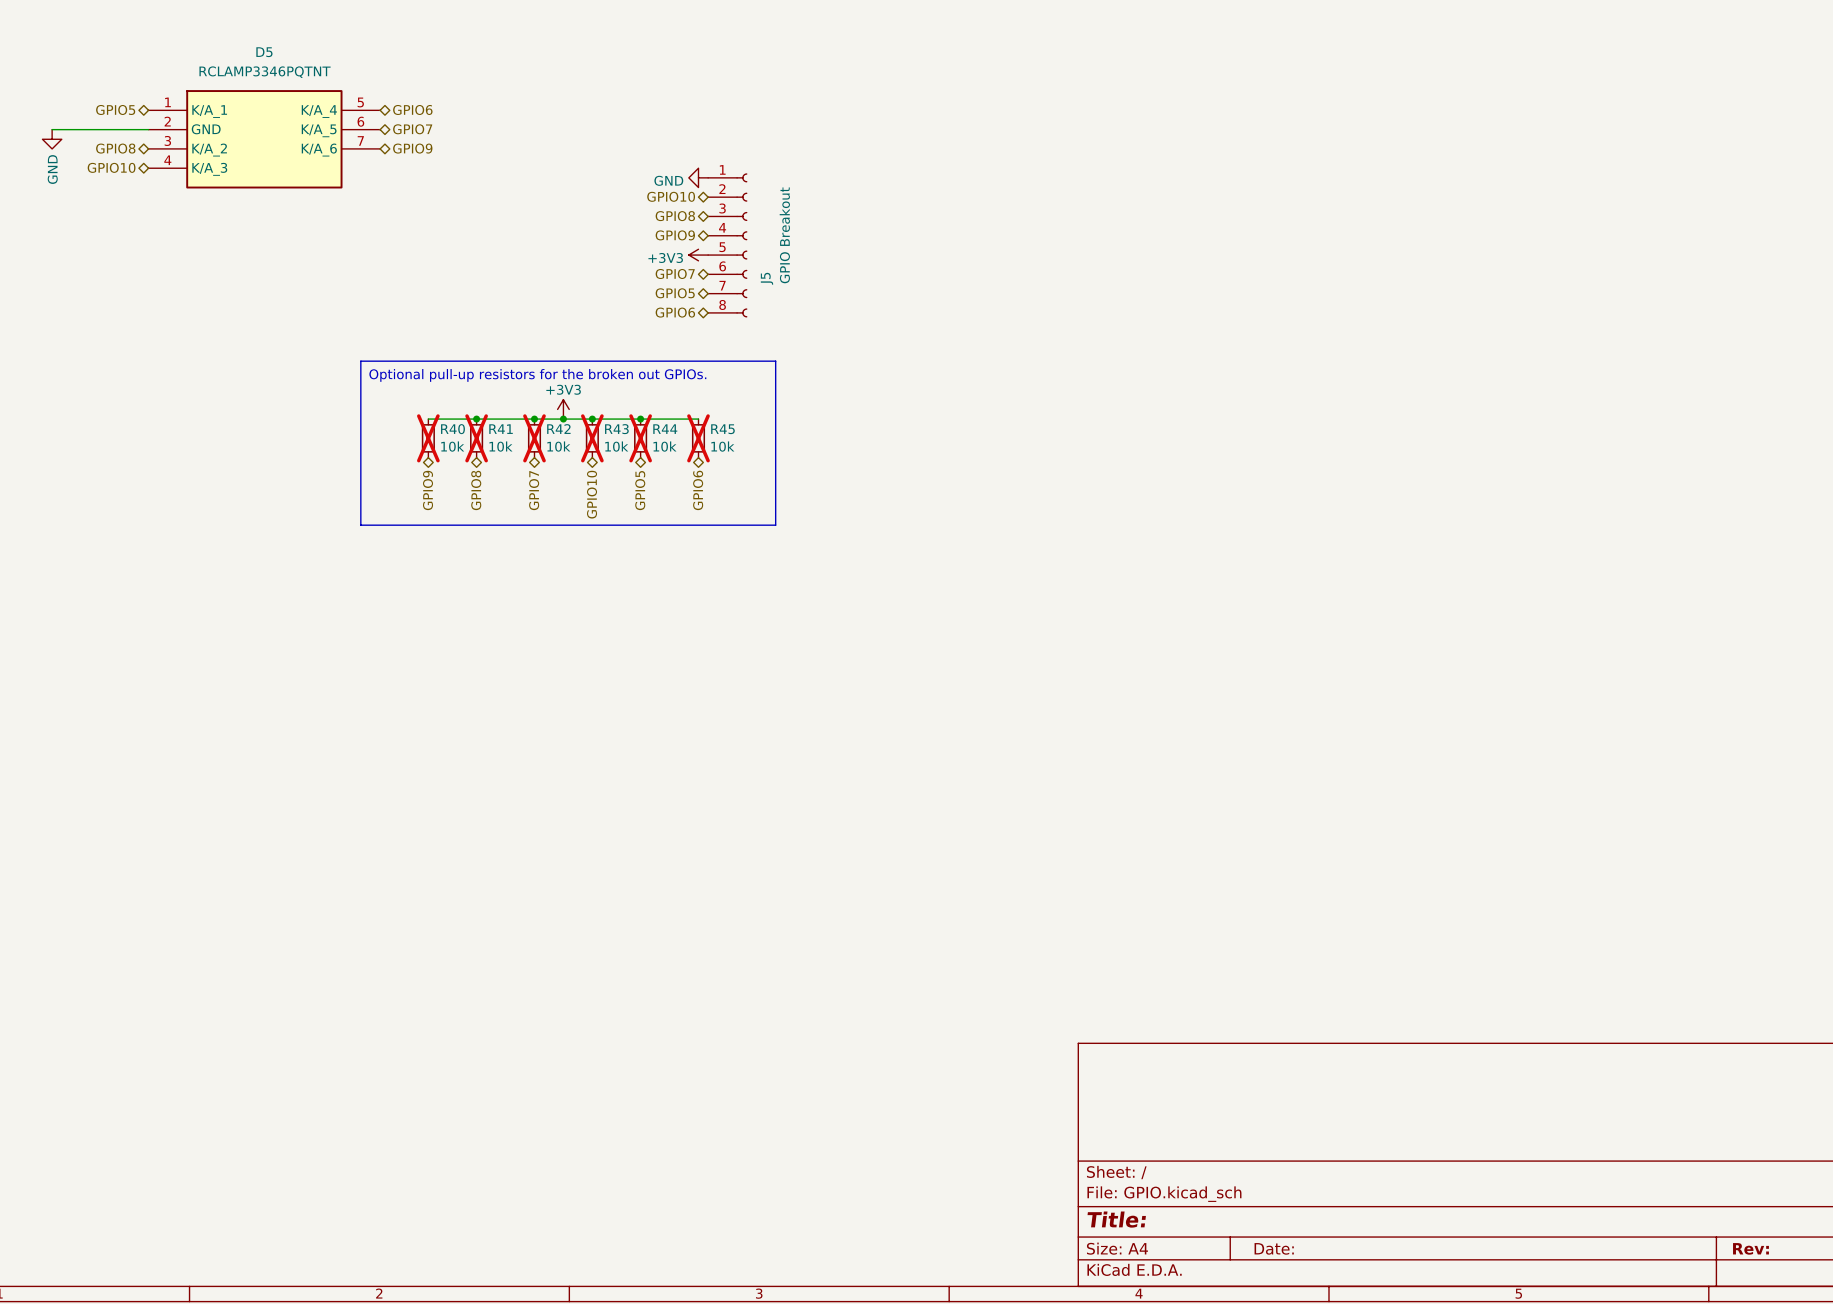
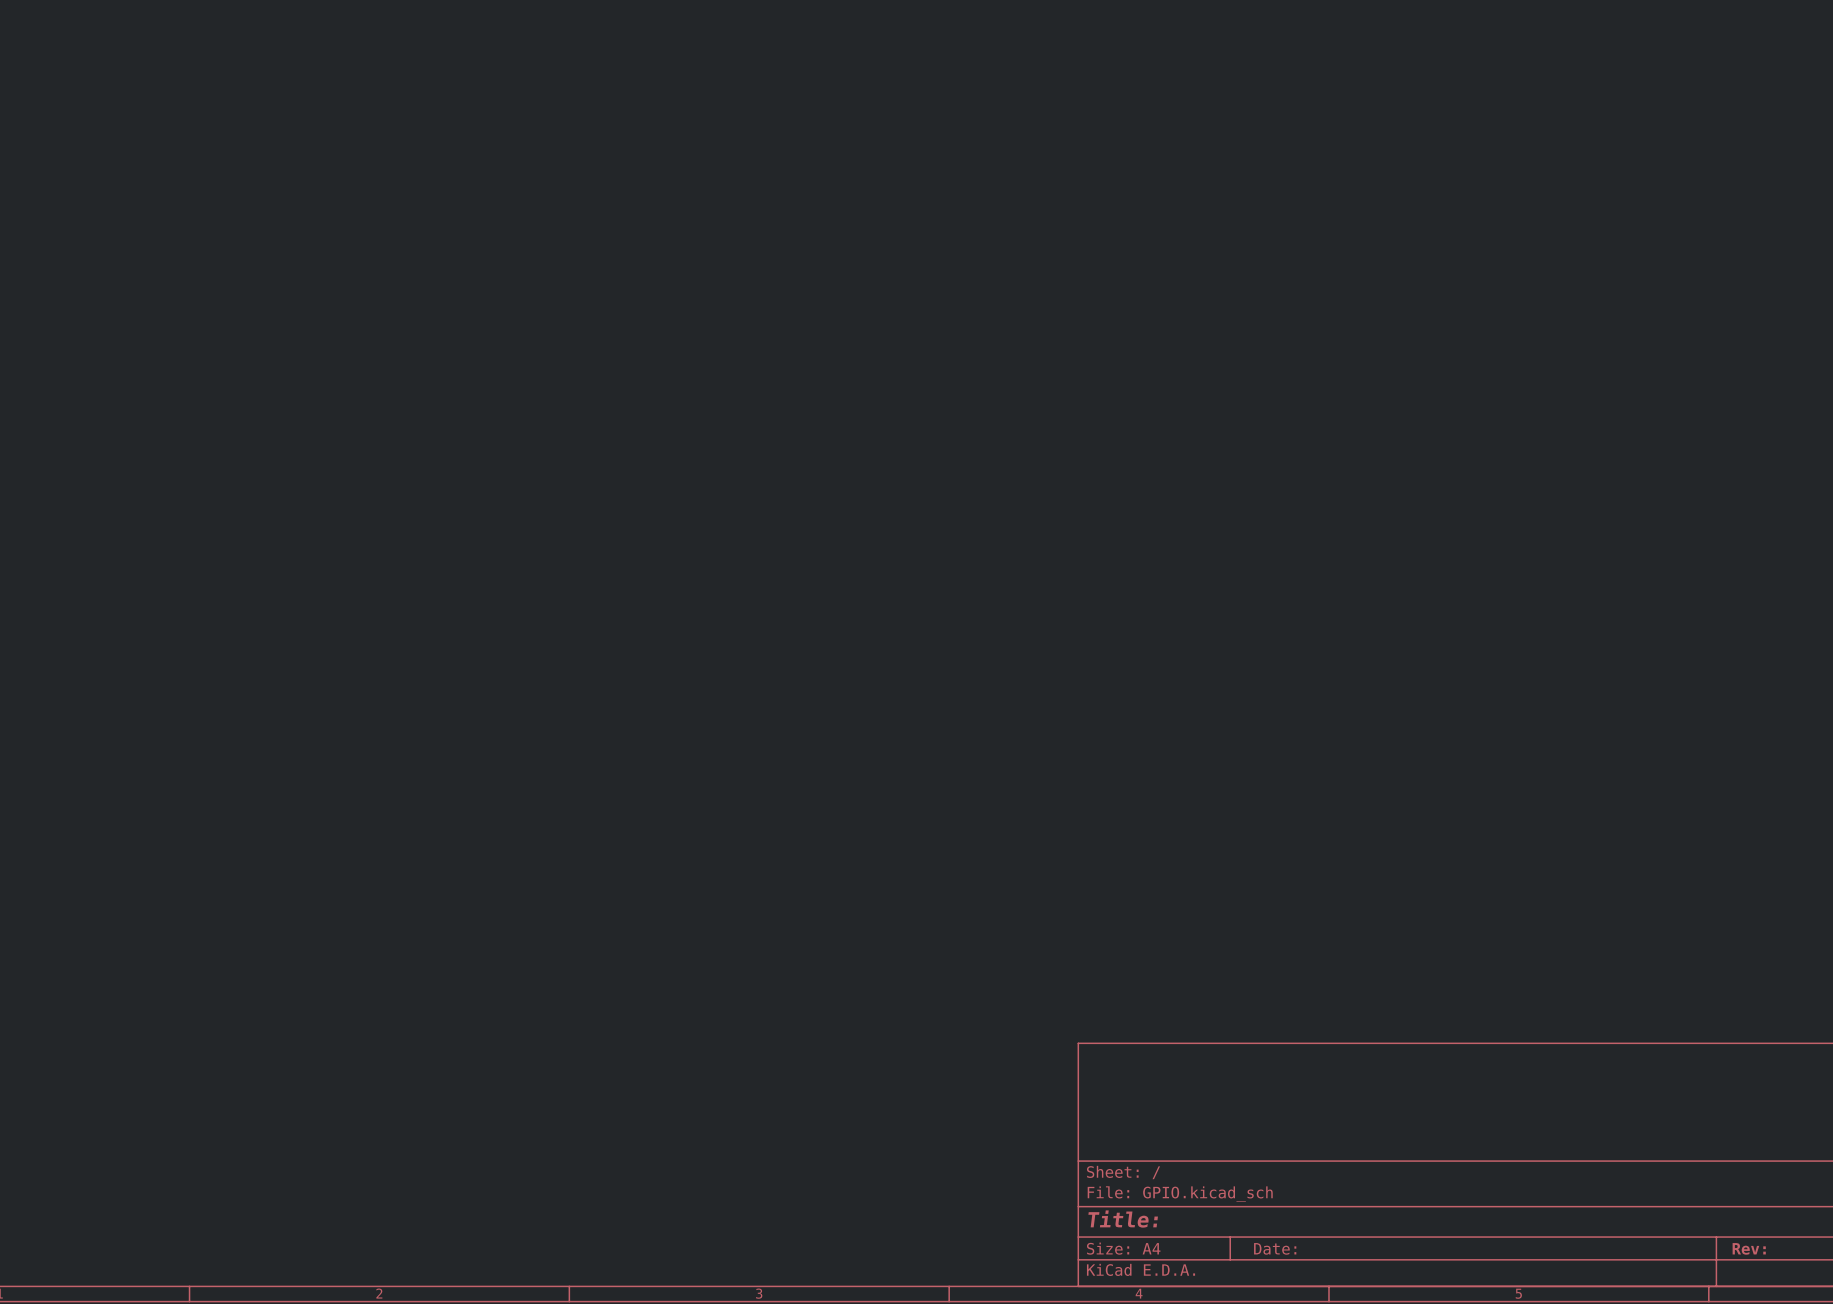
hierarchical label: GPIO5 (115, 109) -> none
hierarchical label: GPIO6 (412, 109) -> none
wire: (52, 129) (148, 129) -> none
hierarchical label: GPIO7 (412, 129) -> none
power symbol: GND (52, 139) -> none
D5: RCLAMP3346PQTNT (264, 139) -> none
hierarchical label: GPIO8 (115, 148) -> none
hierarchical label: GPIO9 (412, 148) -> none
hierarchical label: GPIO10 (111, 167) -> none
power symbol: GND (698, 177) -> none
hierarchical label: GPIO10 (671, 196) -> none
hierarchical label: GPIO8 (675, 216) -> none
hierarchical label: GPIO9 (675, 235) -> none
J5: GPIO Breakout (727, 245) -> none
power symbol: +3V3 (698, 255) -> none
hierarchical label: GPIO7 (675, 273) -> none
hierarchical label: GPIO5 (675, 293) -> none
hierarchical label: GPIO6 (675, 312) -> none
line: (360, 361) (775, 361) (775, 525) (360, 525) (360, 361) -> none
text: Optional pull-up resistors for the broken out GPIOs. (537, 375) -> none
power symbol: +3V3 (563, 409) -> none
wire: (428, 419) (698, 419) -> none
junction: (476, 419) -> none
junction: (534, 419) -> none
junction: (563, 419) -> none
junction: (592, 419) -> none
junction: (640, 419) -> none
R40: 10k (428, 438) -> none
R41: 10k (476, 438) -> none
R42: 10k (534, 438) -> none
R43: 10k (592, 438) -> none
R44: 10k (640, 438) -> none
R45: 10k (698, 438) -> none
hierarchical label: GPIO9 (428, 490) -> none
hierarchical label: GPIO8 (476, 490) -> none
hierarchical label: GPIO7 (534, 490) -> none
hierarchical label: GPIO5 (640, 490) -> none
hierarchical label: GPIO6 (698, 490) -> none
hierarchical label: GPIO10 (592, 494) -> none

